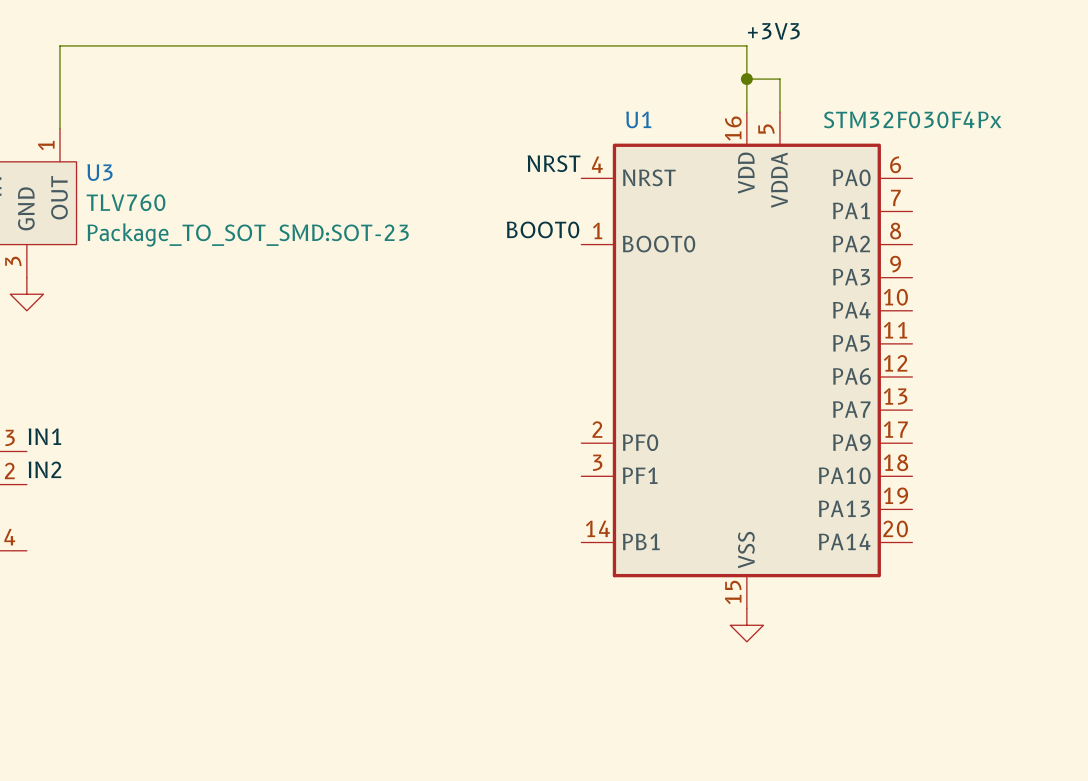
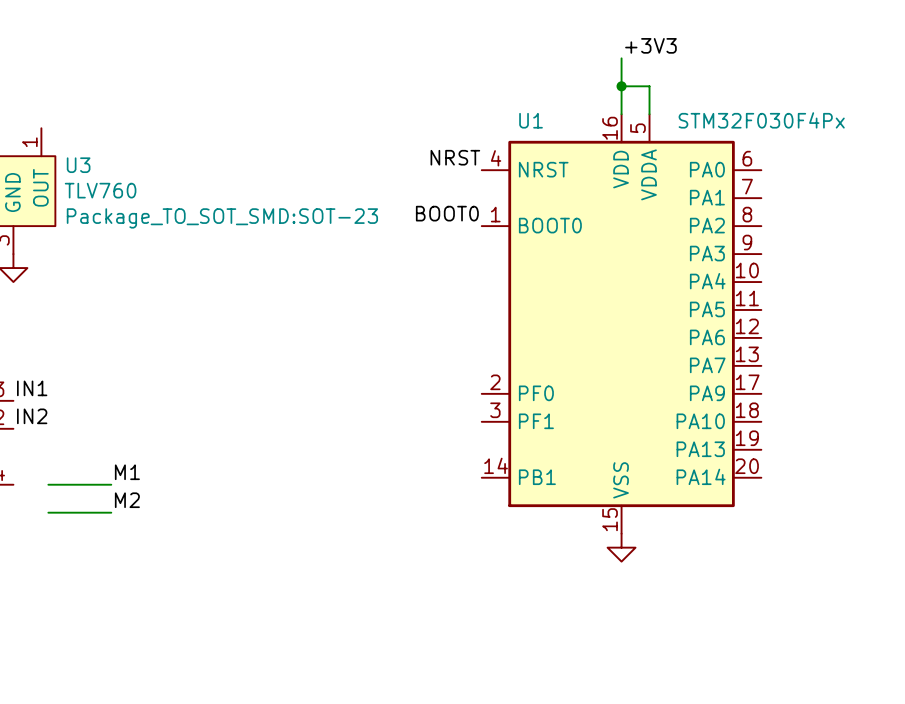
wire: (746, 45) (59, 45) (59, 128) -> none
label: none -> M1 (127, 472)
wire: none -> (48, 484) (111, 484)
label: none -> M2 (127, 500)
wire: none -> (48, 512) (111, 512)

